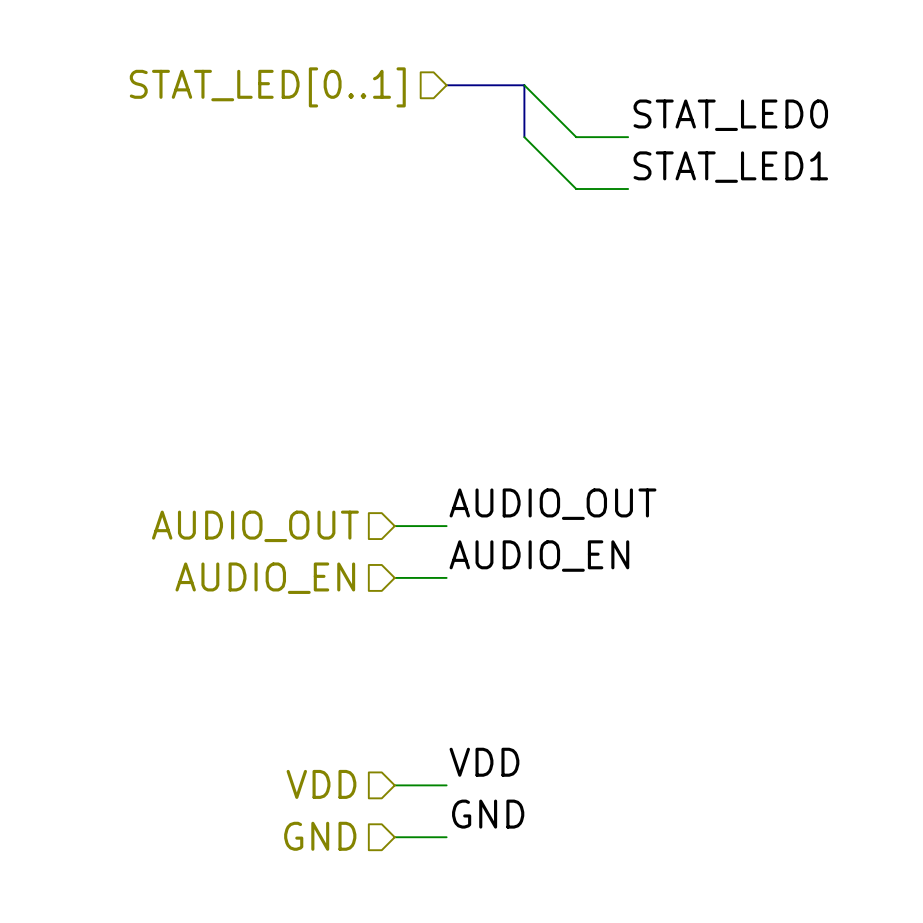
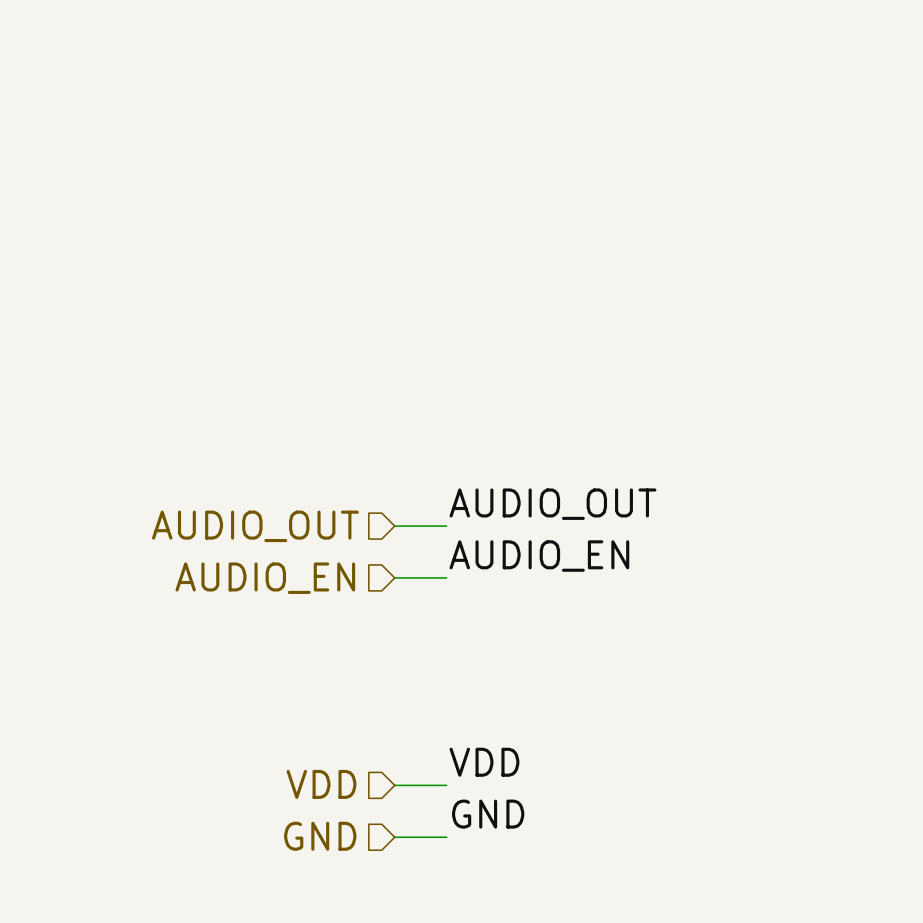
bus: (446, 85) (524, 85) (524, 137) -> none
wire: (524, 85) (576, 137) (628, 137) -> none
hierarchical label: STAT_LED[0..1] (267, 87) -> none
label: STAT_LED0 (730, 115) -> none
wire: (524, 137) (576, 189) (628, 189) -> none
label: STAT_LED1 (730, 167) -> none

